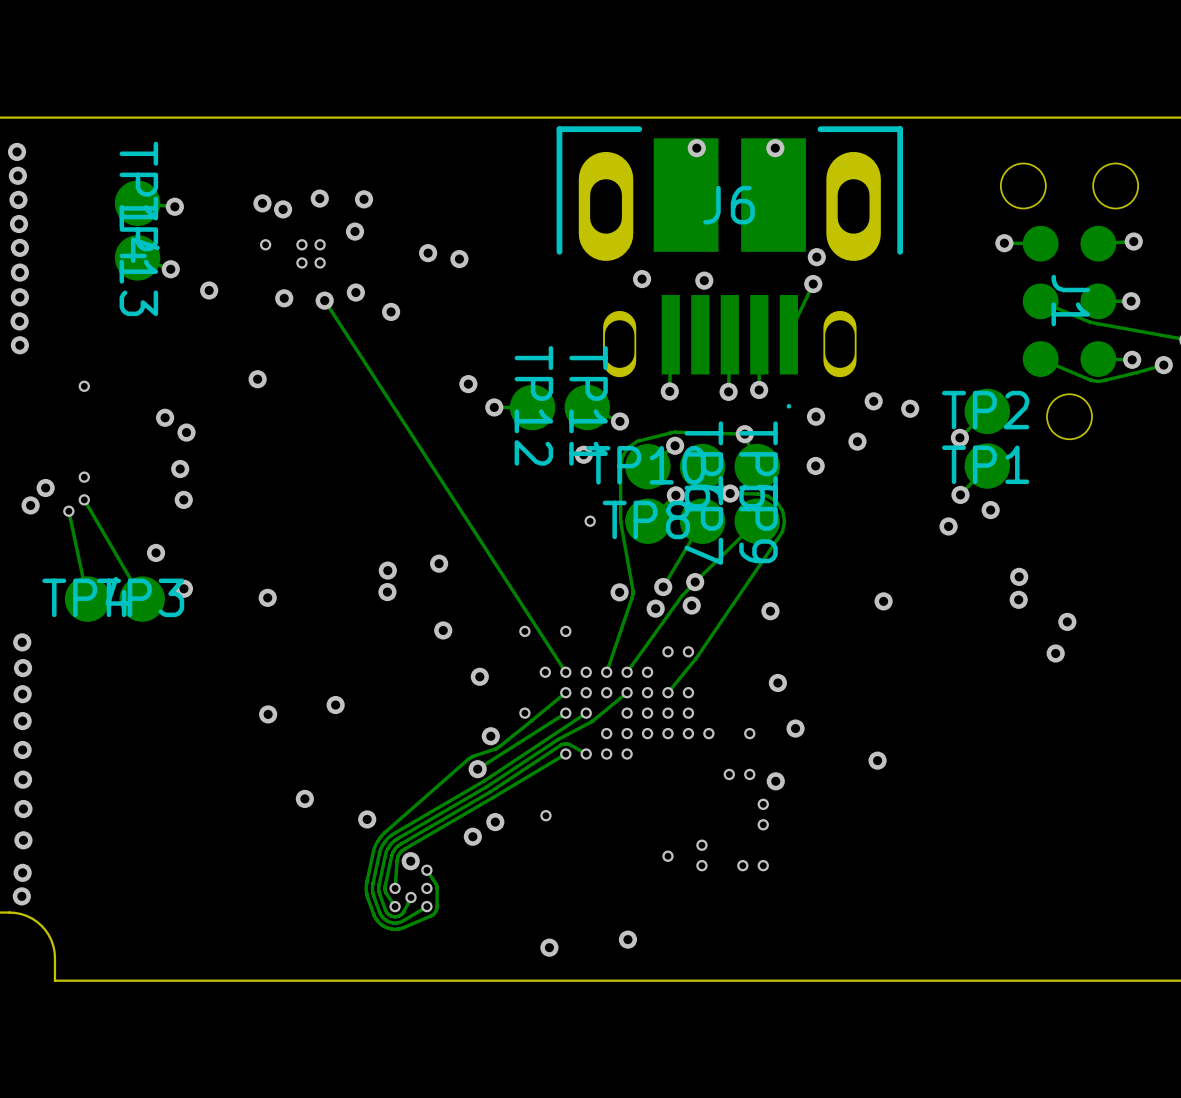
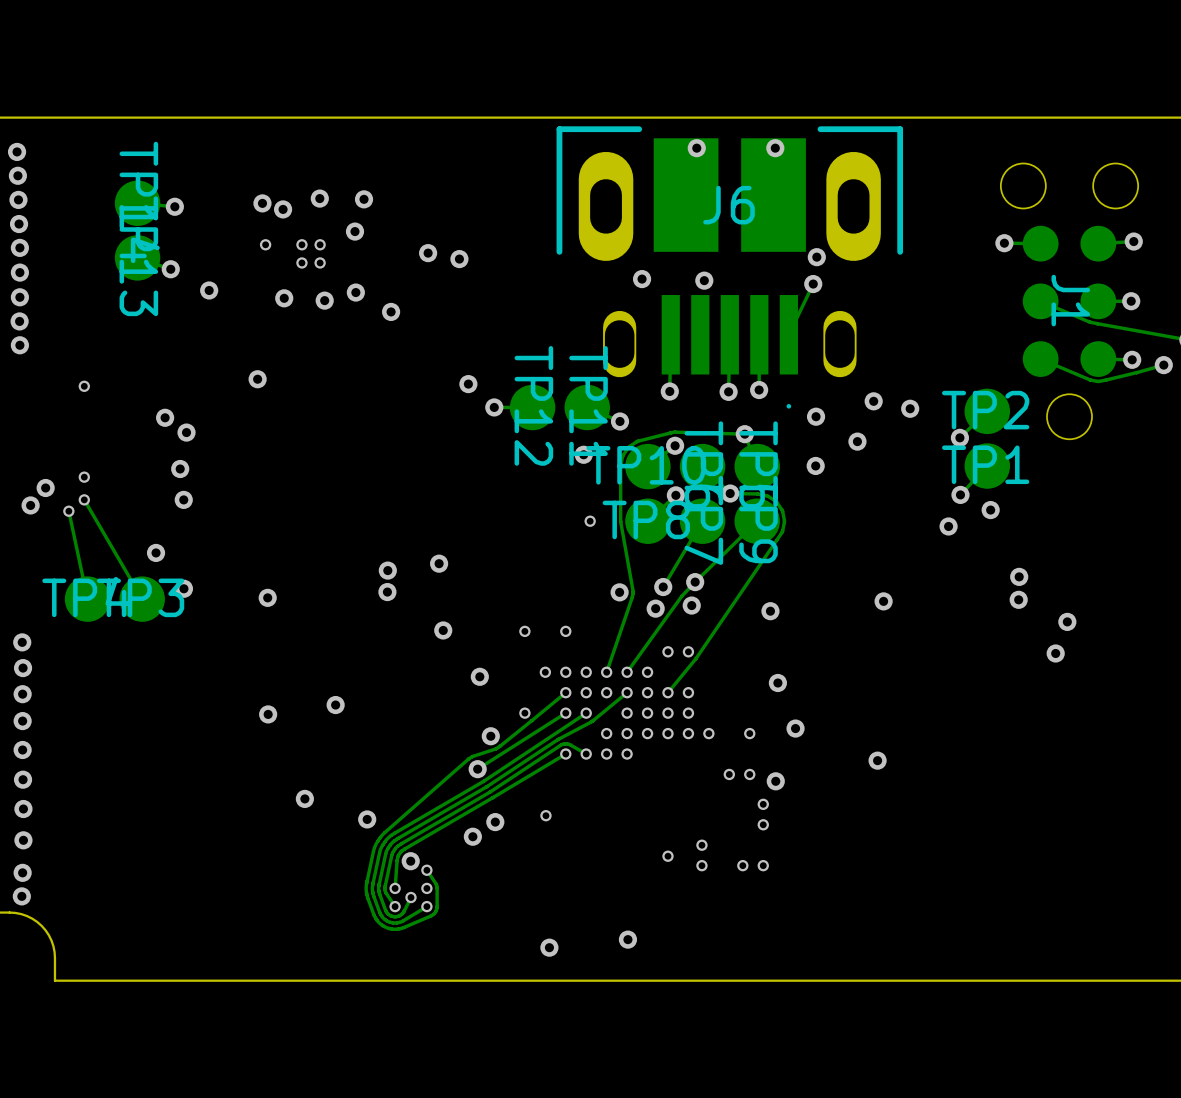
track: (324, 300) (565, 672) -> none

